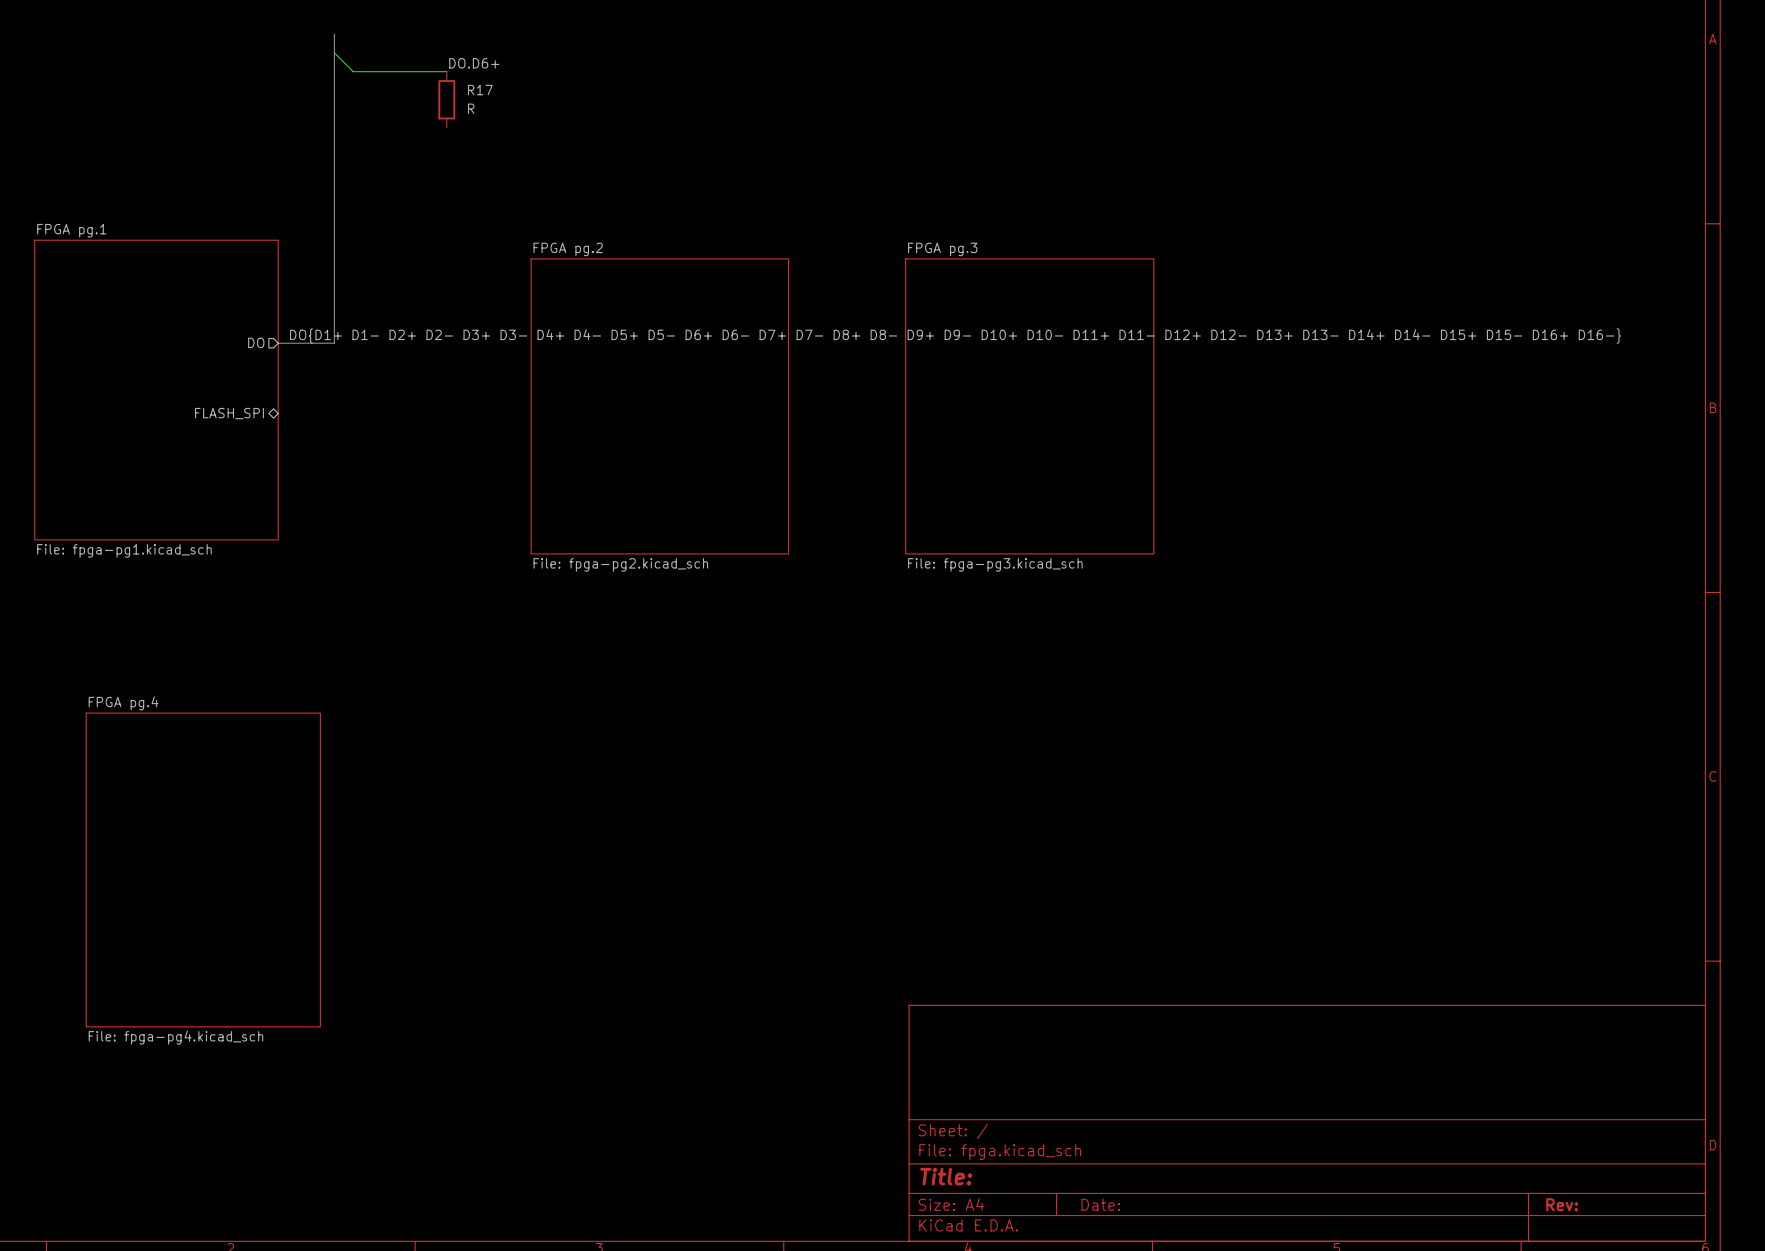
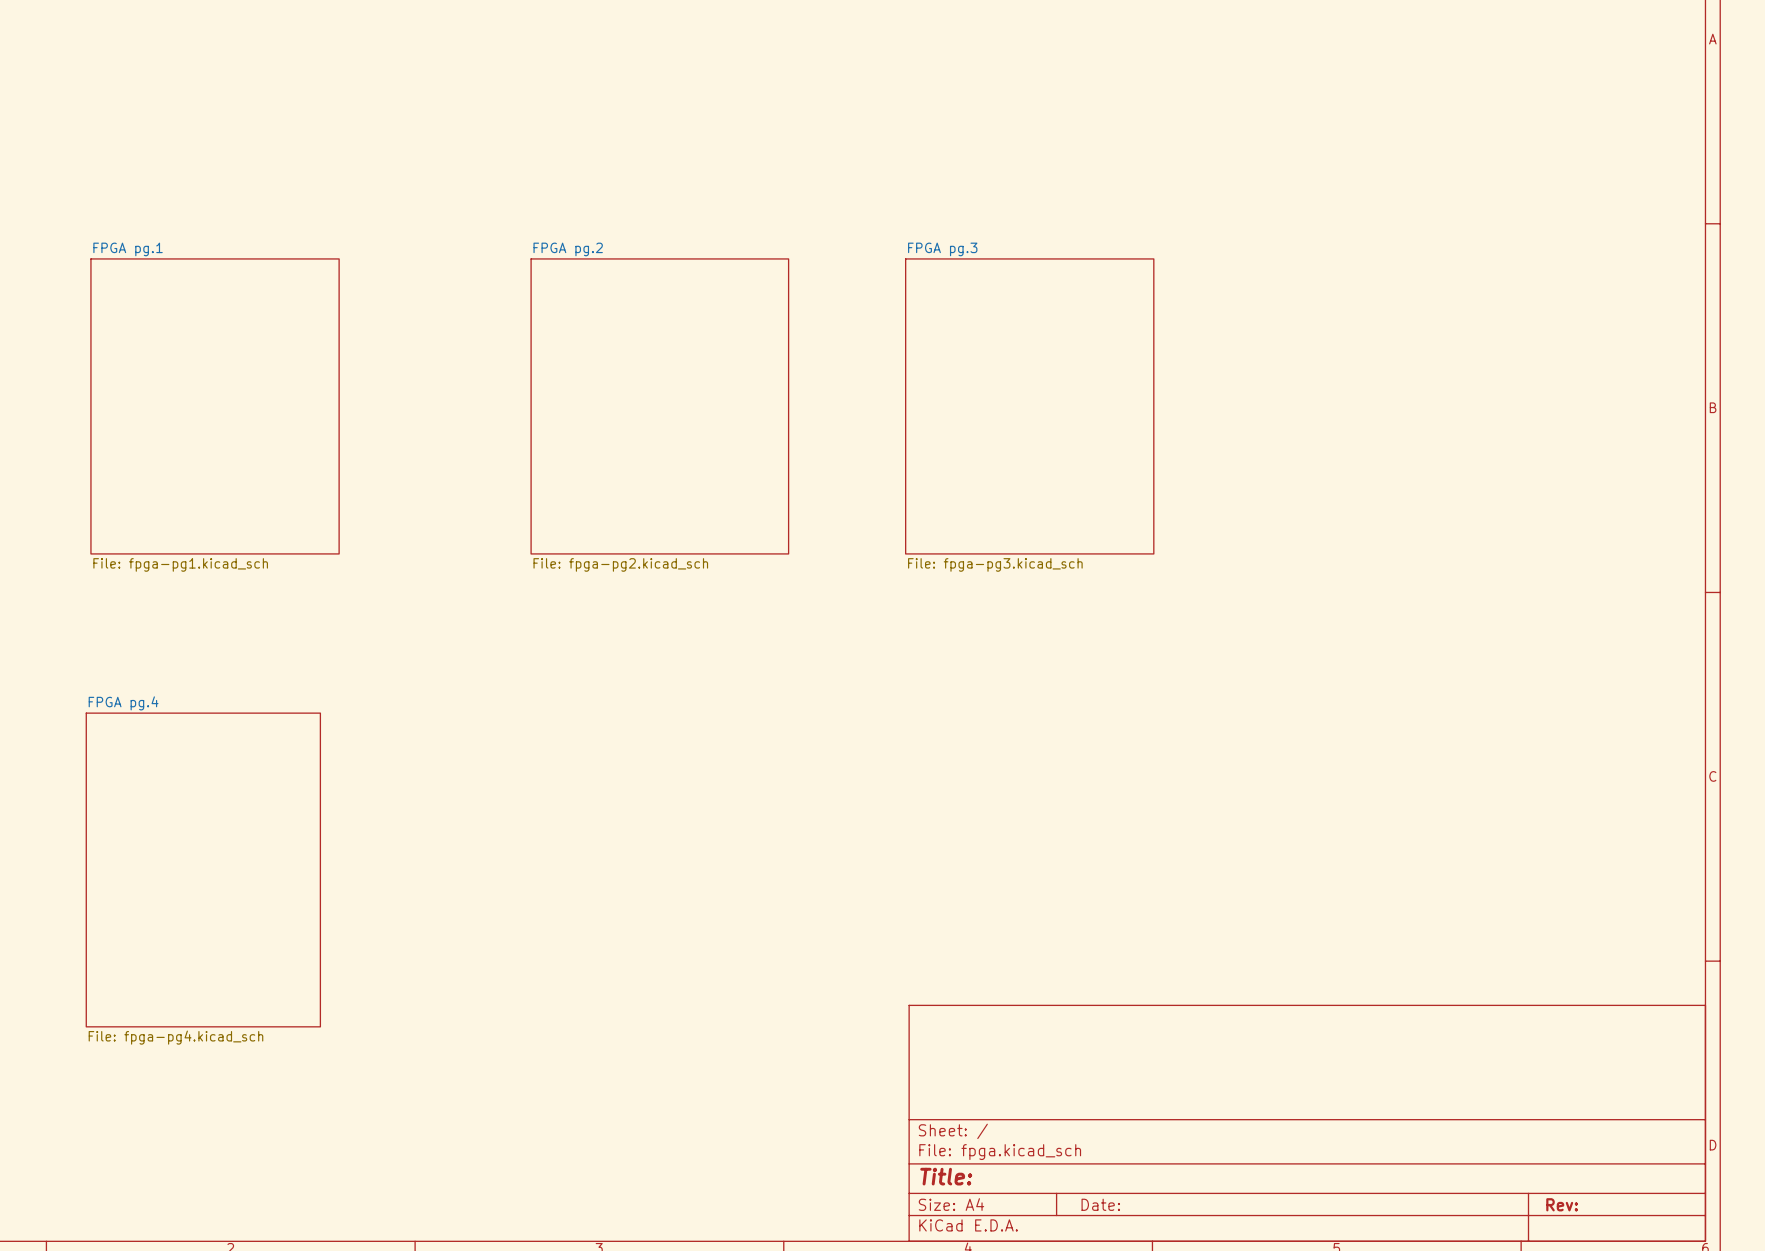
bus: (334, 34) (334, 343) (278, 343) -> none
wire: (334, 52) (353, 71) (446, 71) -> none
label: DO.D6+ (474, 63) -> none
R17: R (446, 99) -> none
sheet FPGA pg.1 shape: [34, 239, 279, 541] -> [90, 258, 340, 555]
label: DO{D1+ D1- D2+ D2- D3+ D3- D4+ D4- D5+ D5- D6+ D6- D7+ D7- D8+ D8- D9+ D9- D10+ D10- D11+ D11- D12+ D12- D13+ D13- D14+ D14- D15+ D15- D16+ D16-} (955, 335) -> none
sheet pin: DO (256, 342) -> none
sheet pin: FLASH_SPI (229, 413) -> none

